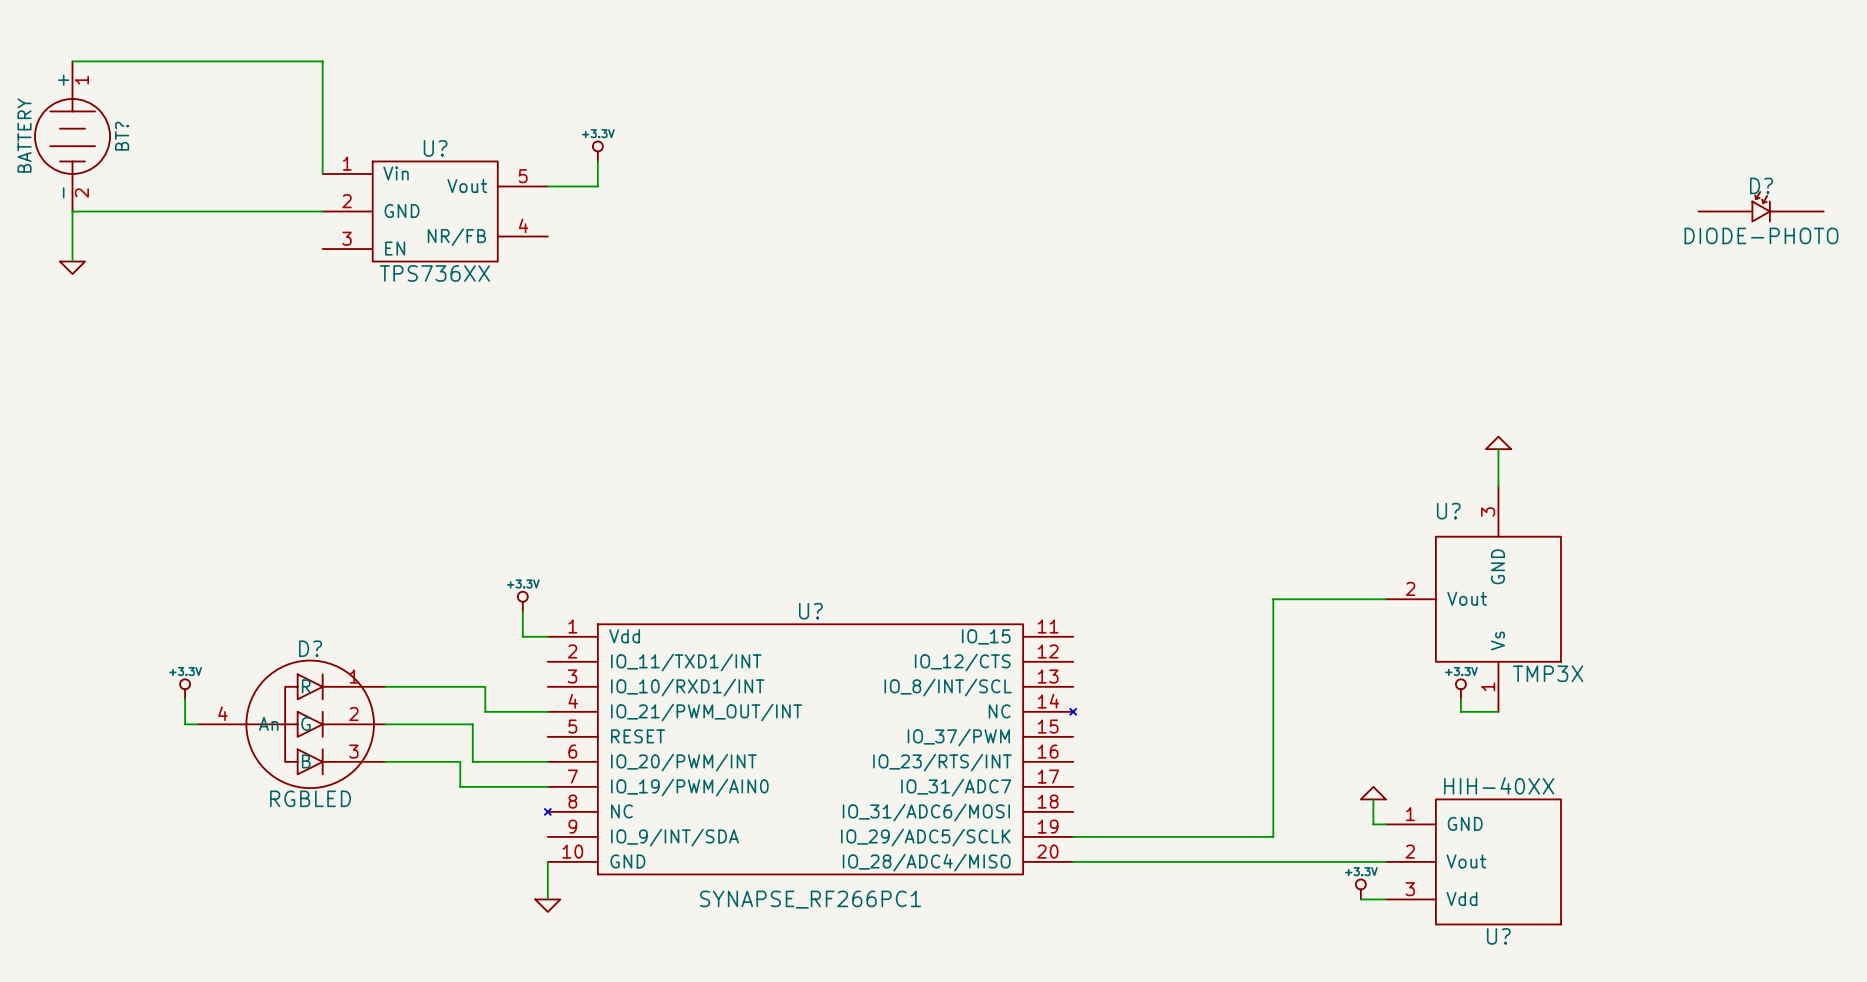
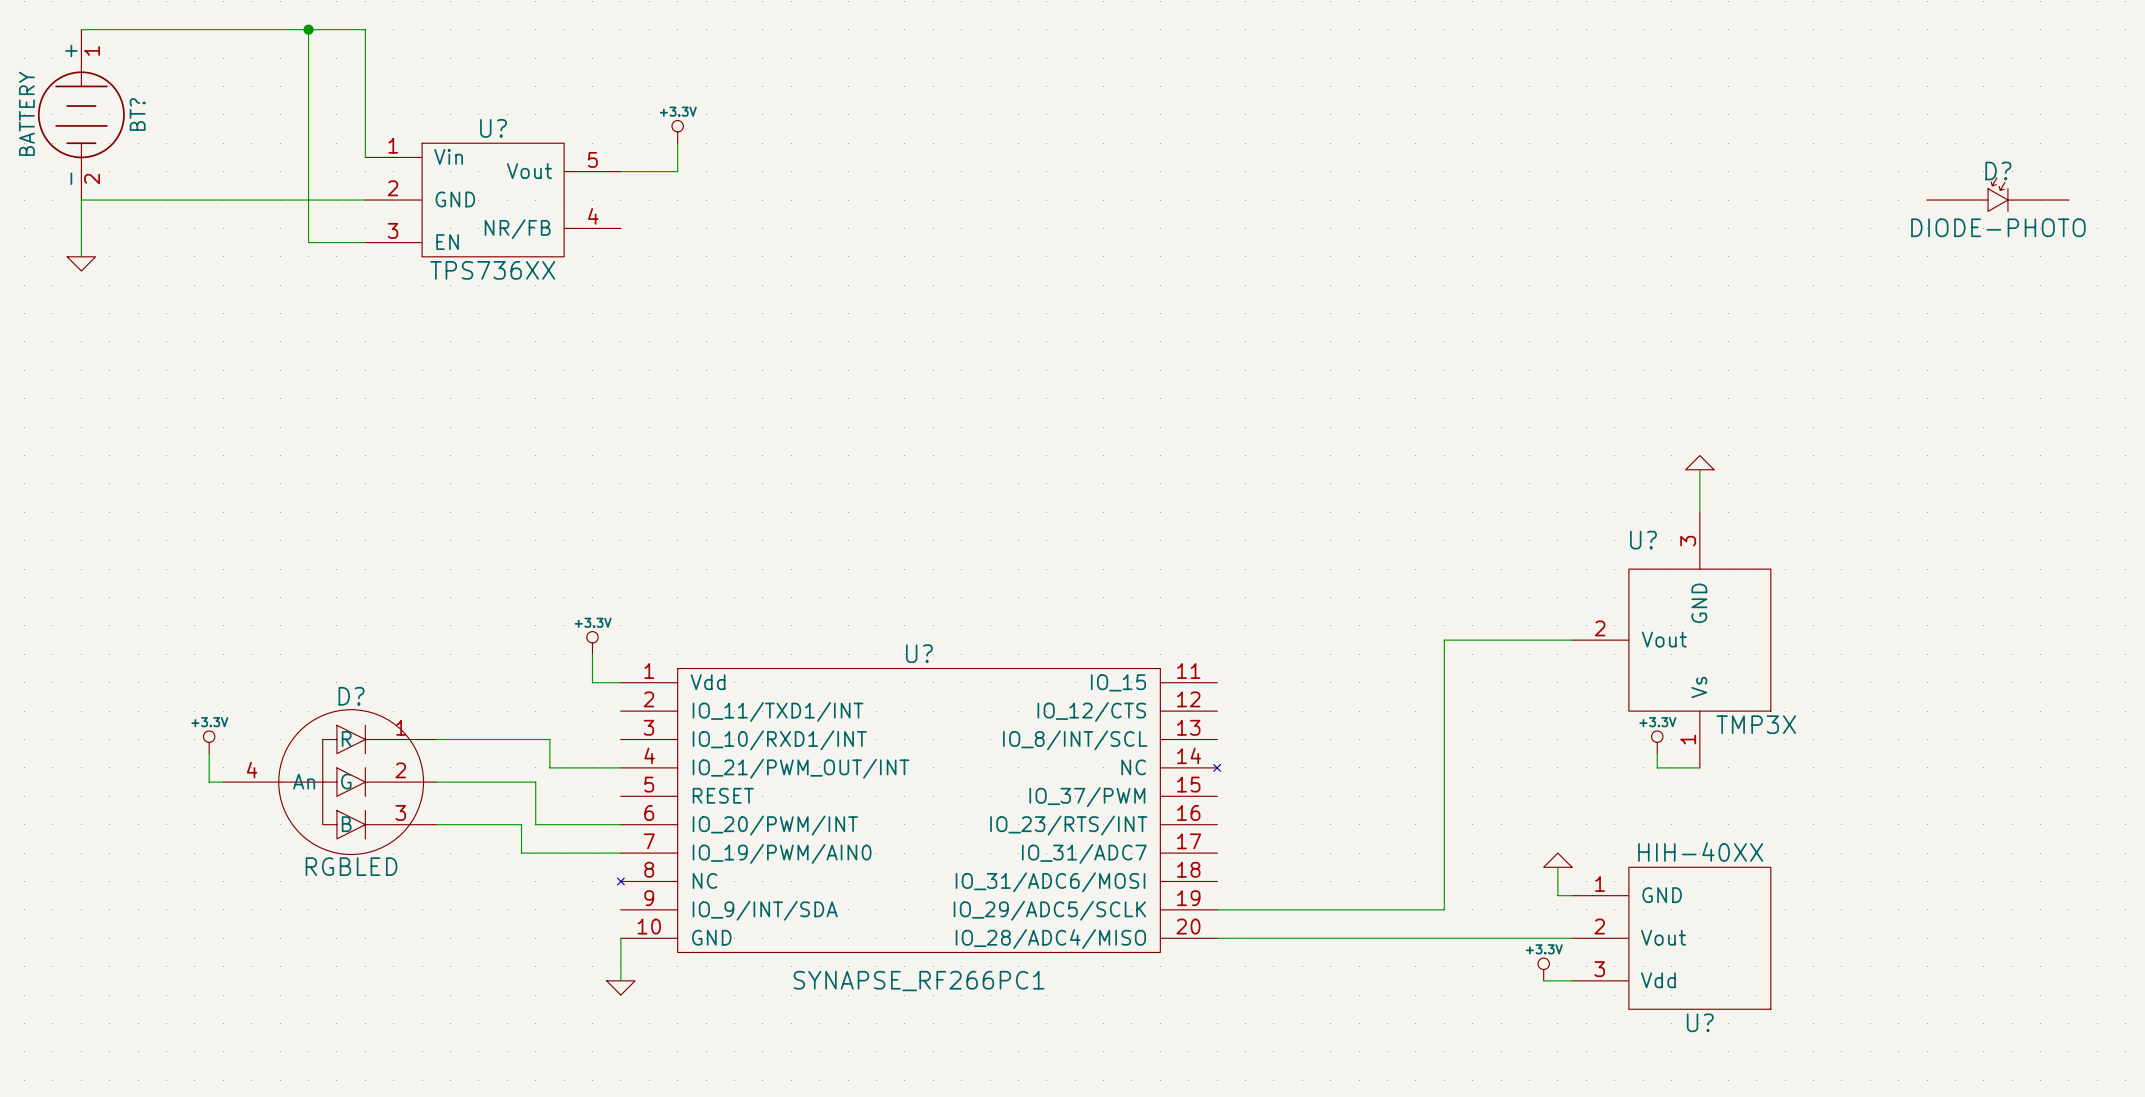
wire: none -> (308, 29) (308, 242) (365, 242)
junction: none -> (308, 29)

